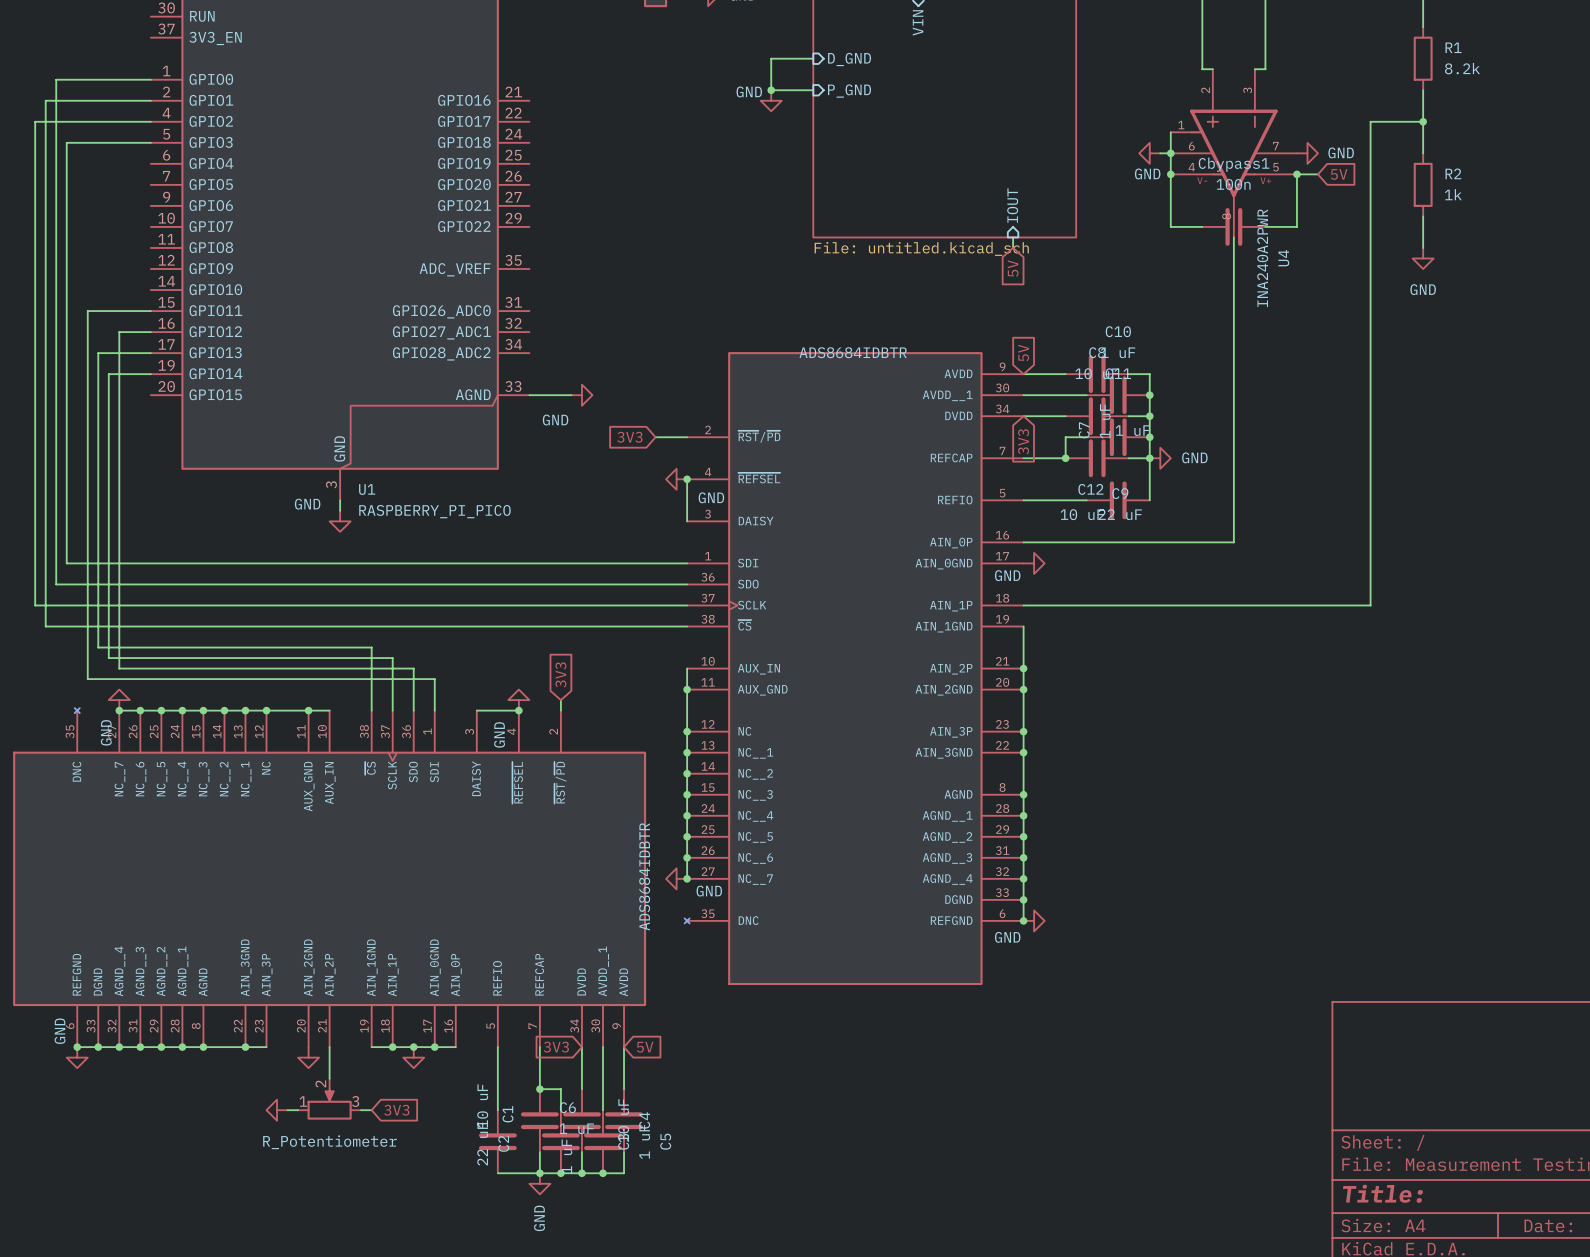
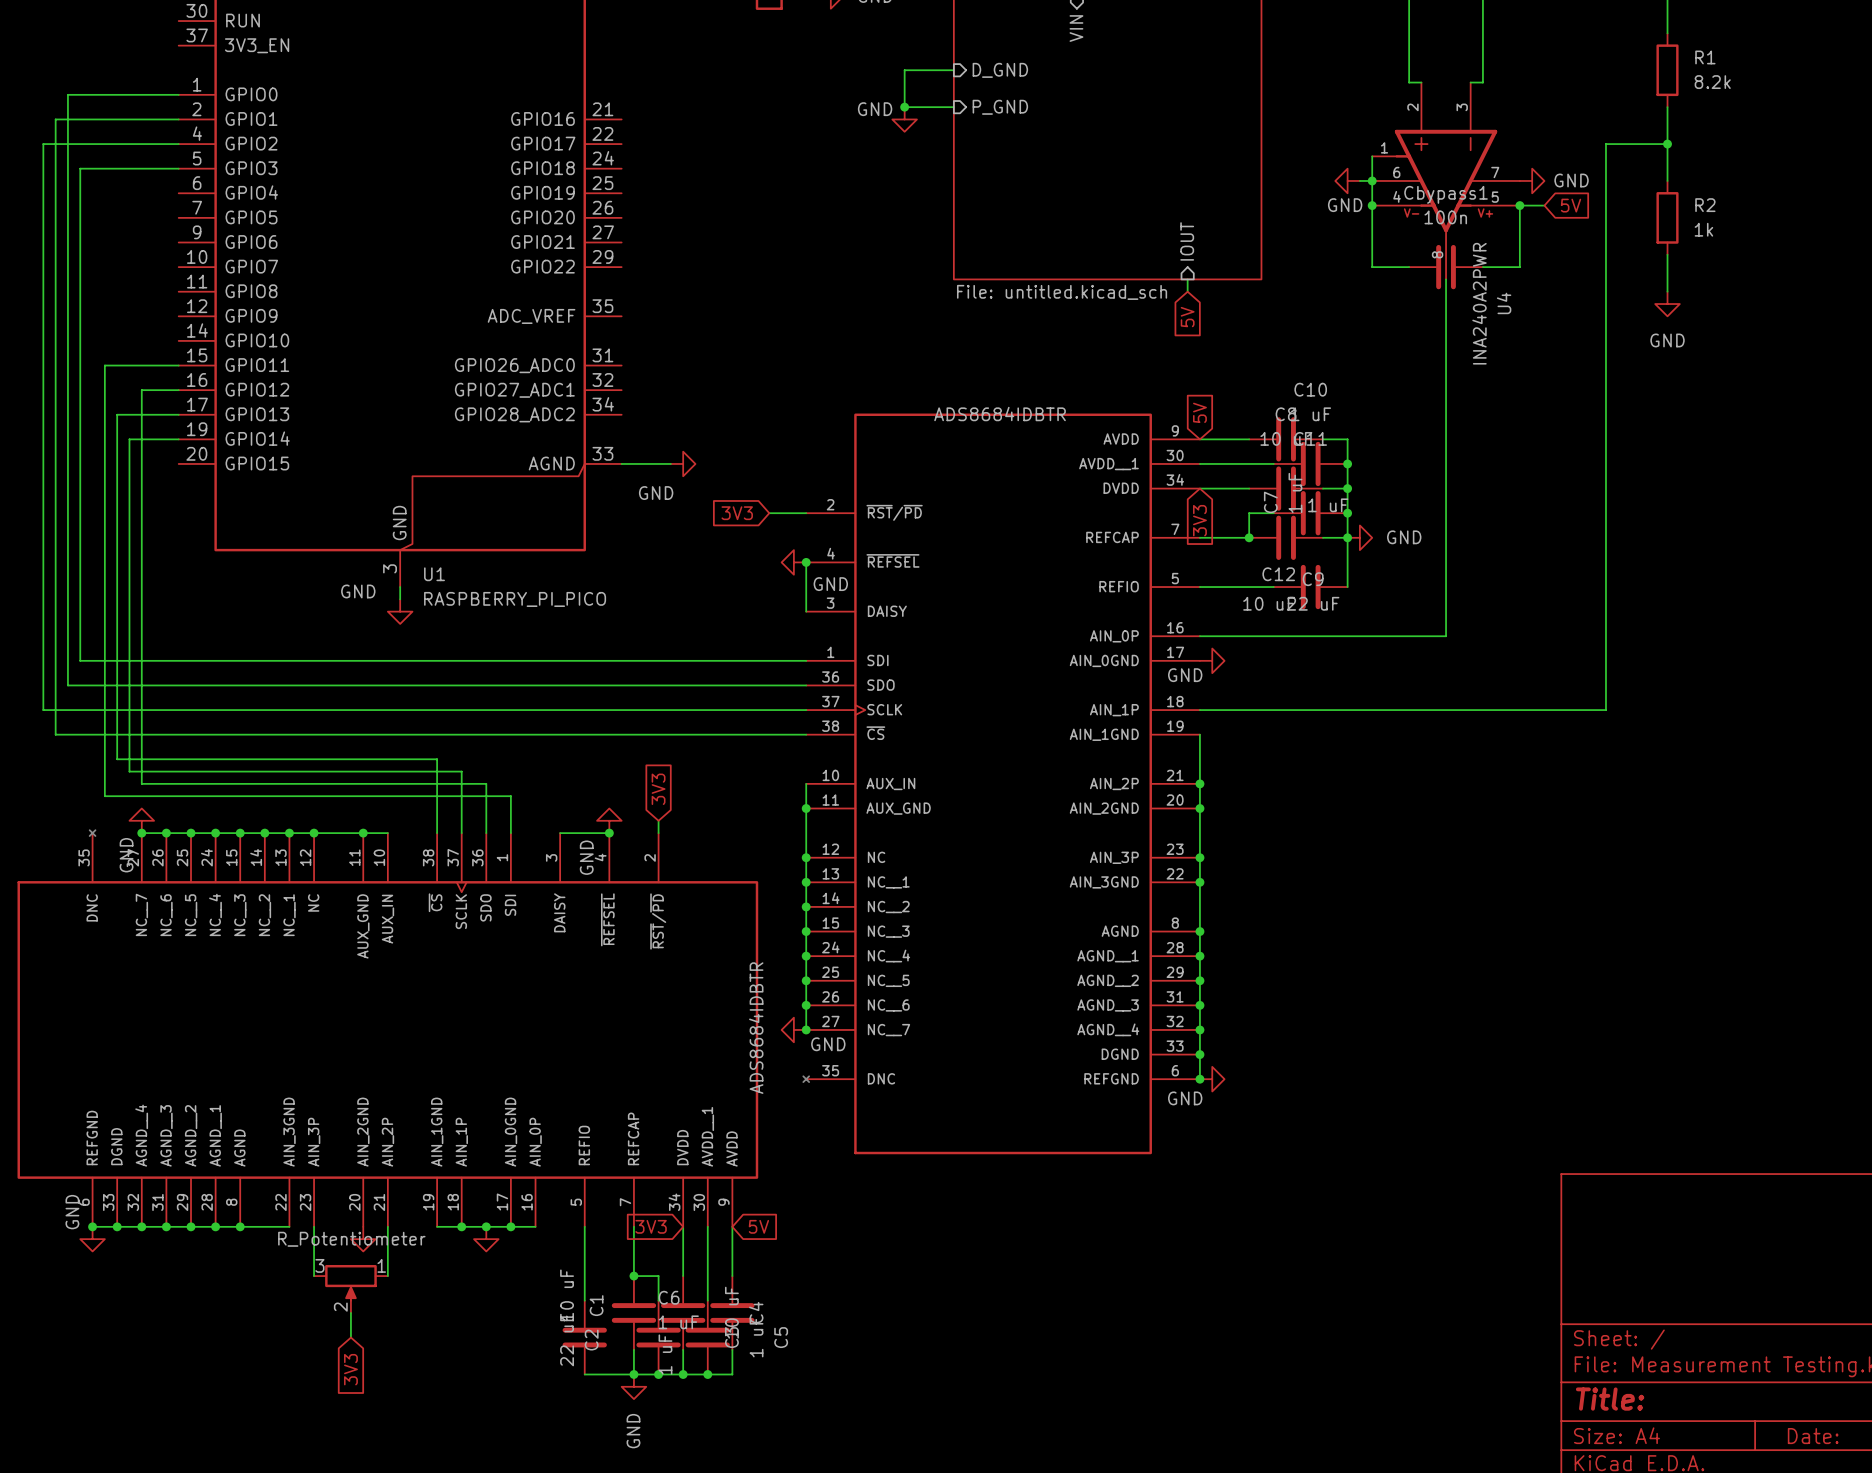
wire: (245, 1047) (266, 1047) -> (314, 1276) (314, 1226)
junction: (245, 1047) -> none
part rotation: 0° (329, 1104) -> 180° (350, 1282)
power symbol: (277, 1110) -> none
wire: (287, 1110) (298, 1110) -> none
wire: (361, 1110) (371, 1110) -> none
global label rotation: 0° (396, 1110) -> 90° clockwise (350, 1369)
global label position: 3V3 (396, 1110) -> 3V3 (350, 1369)
wire: none -> (350, 1312) (350, 1337)

